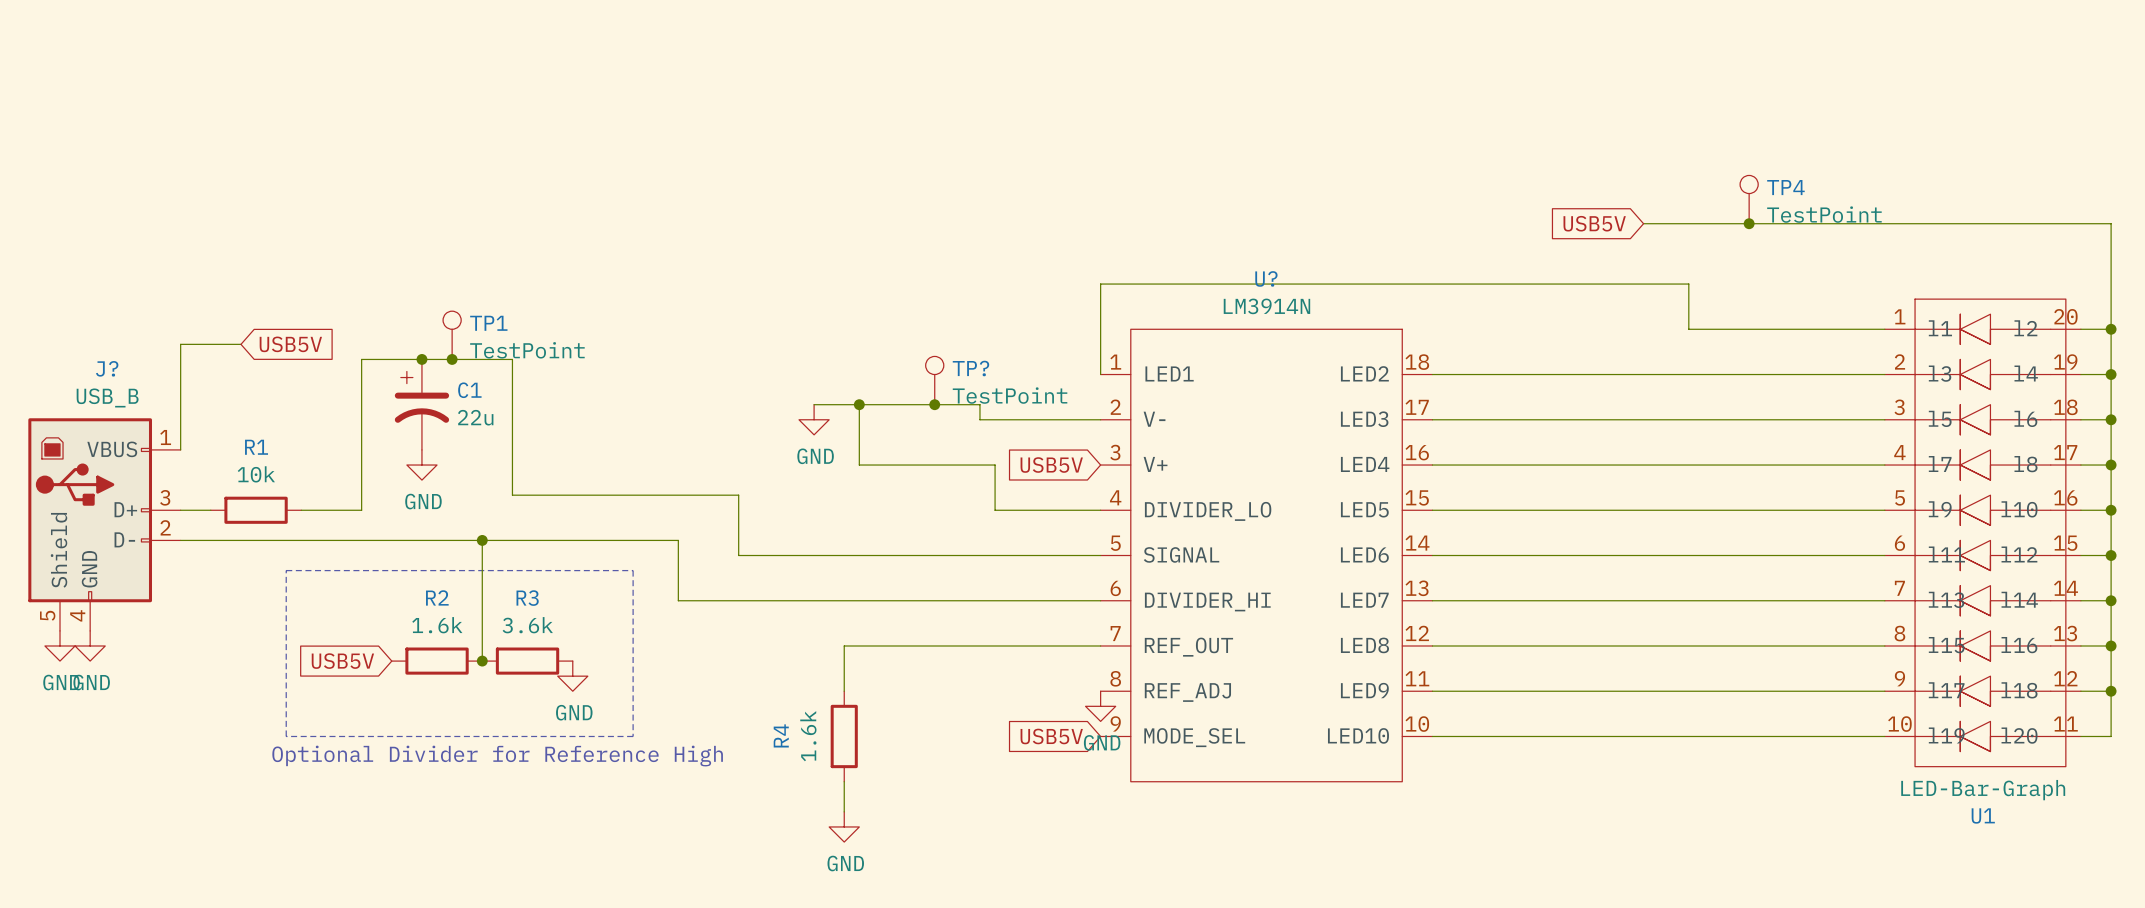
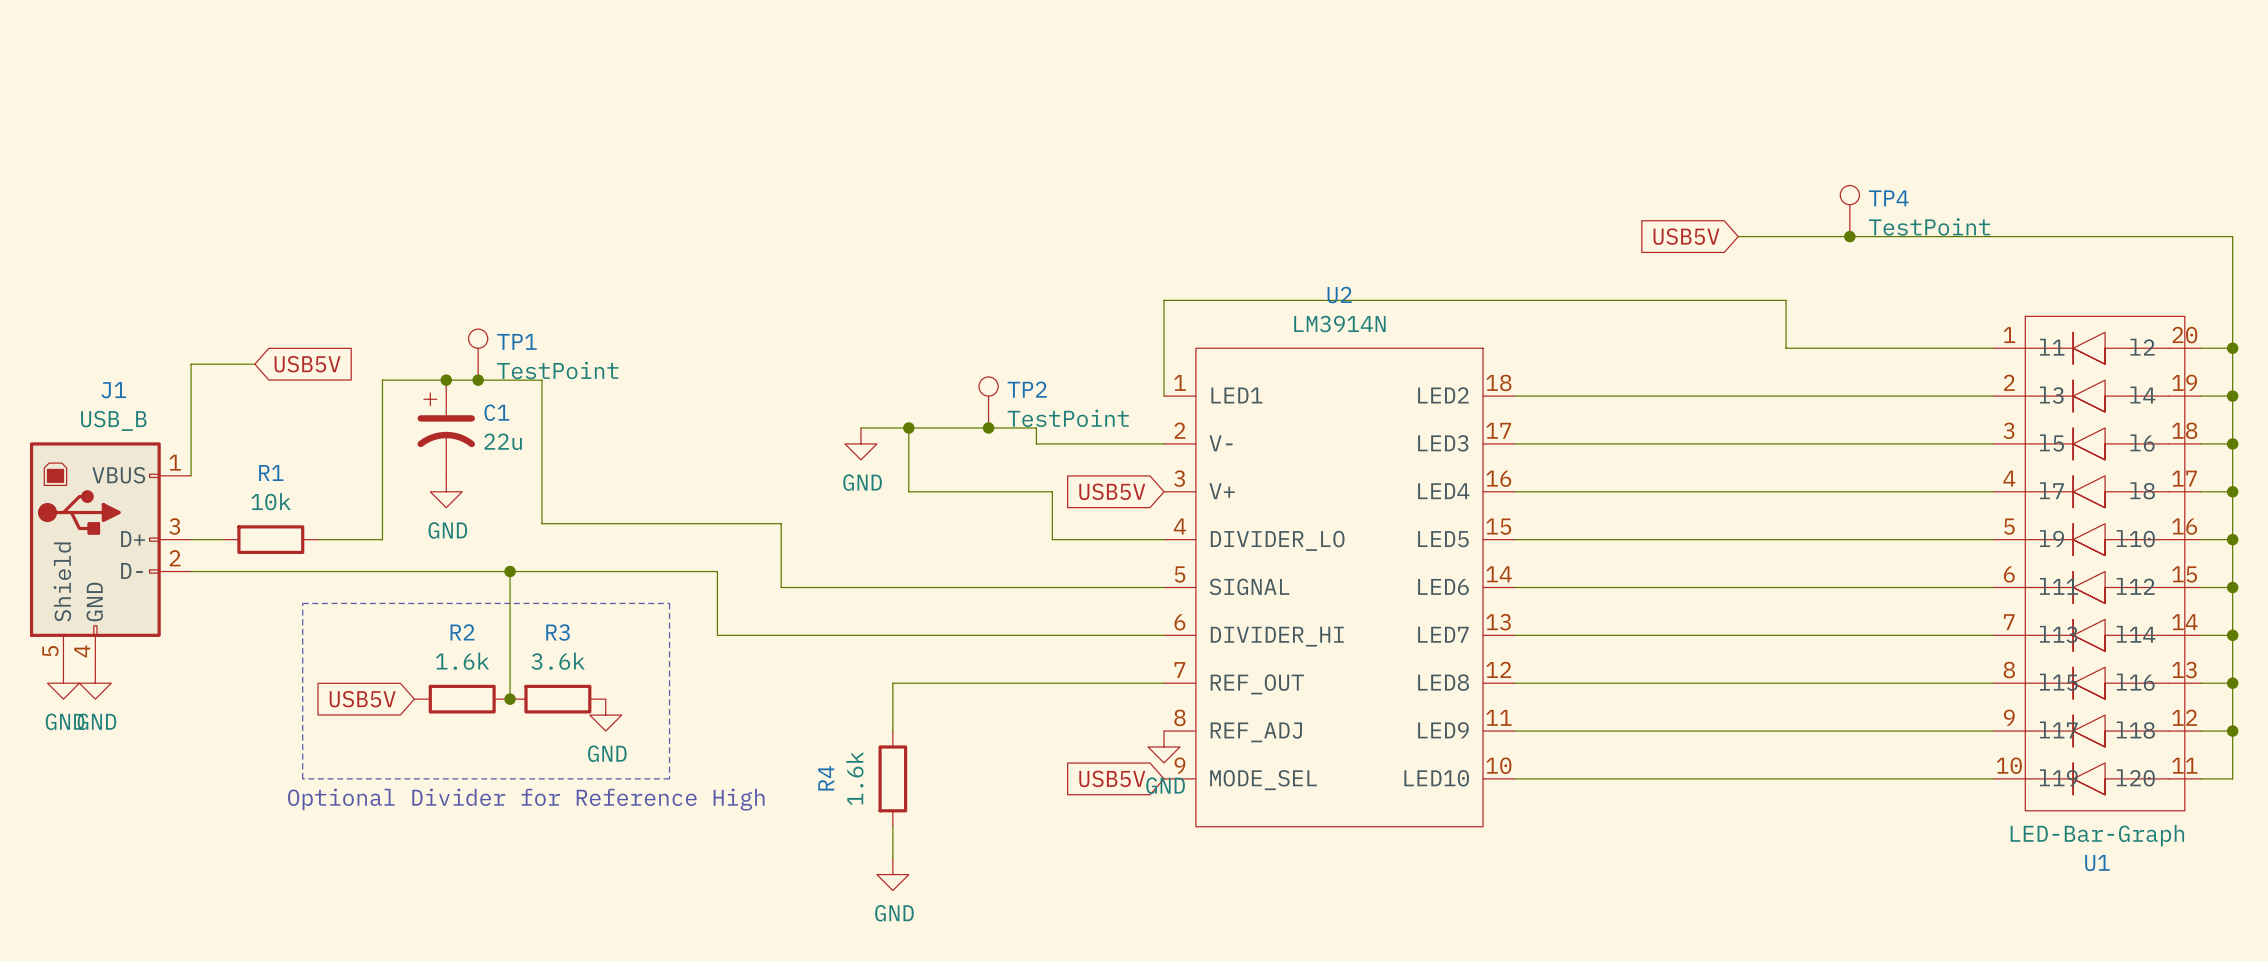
U? name: U? (1266, 278) -> U2 (1339, 295)
J? name: J? (107, 368) -> J1 (113, 390)
TP? name: TP? (970, 368) -> TP2 (1027, 389)

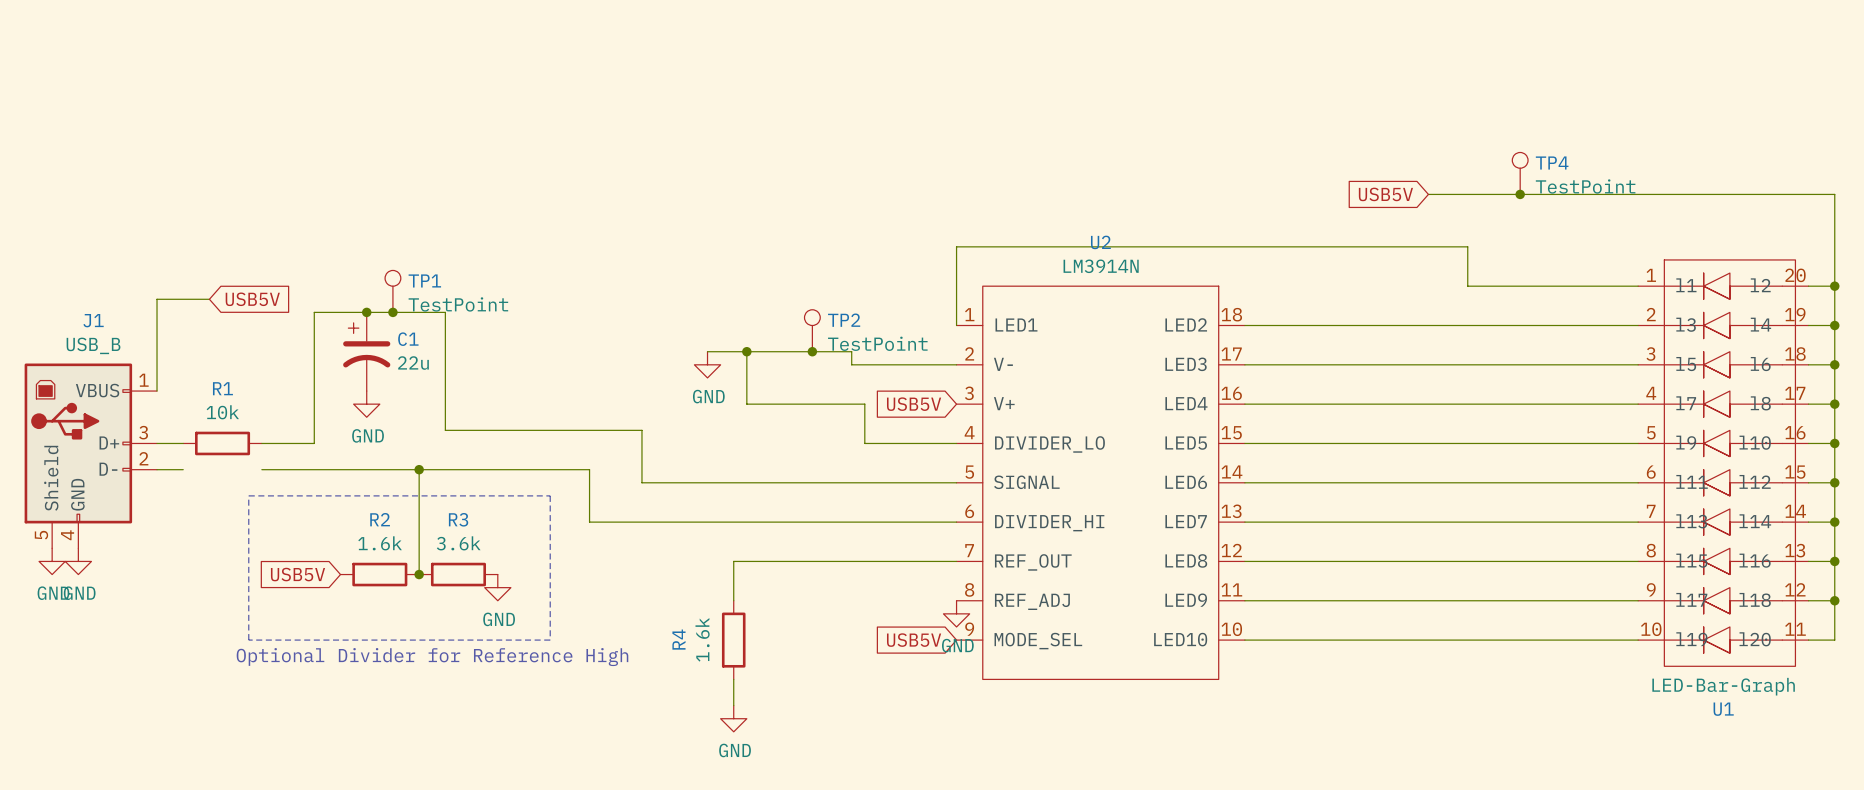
wire: (222, 571) (318, 571) -> none

